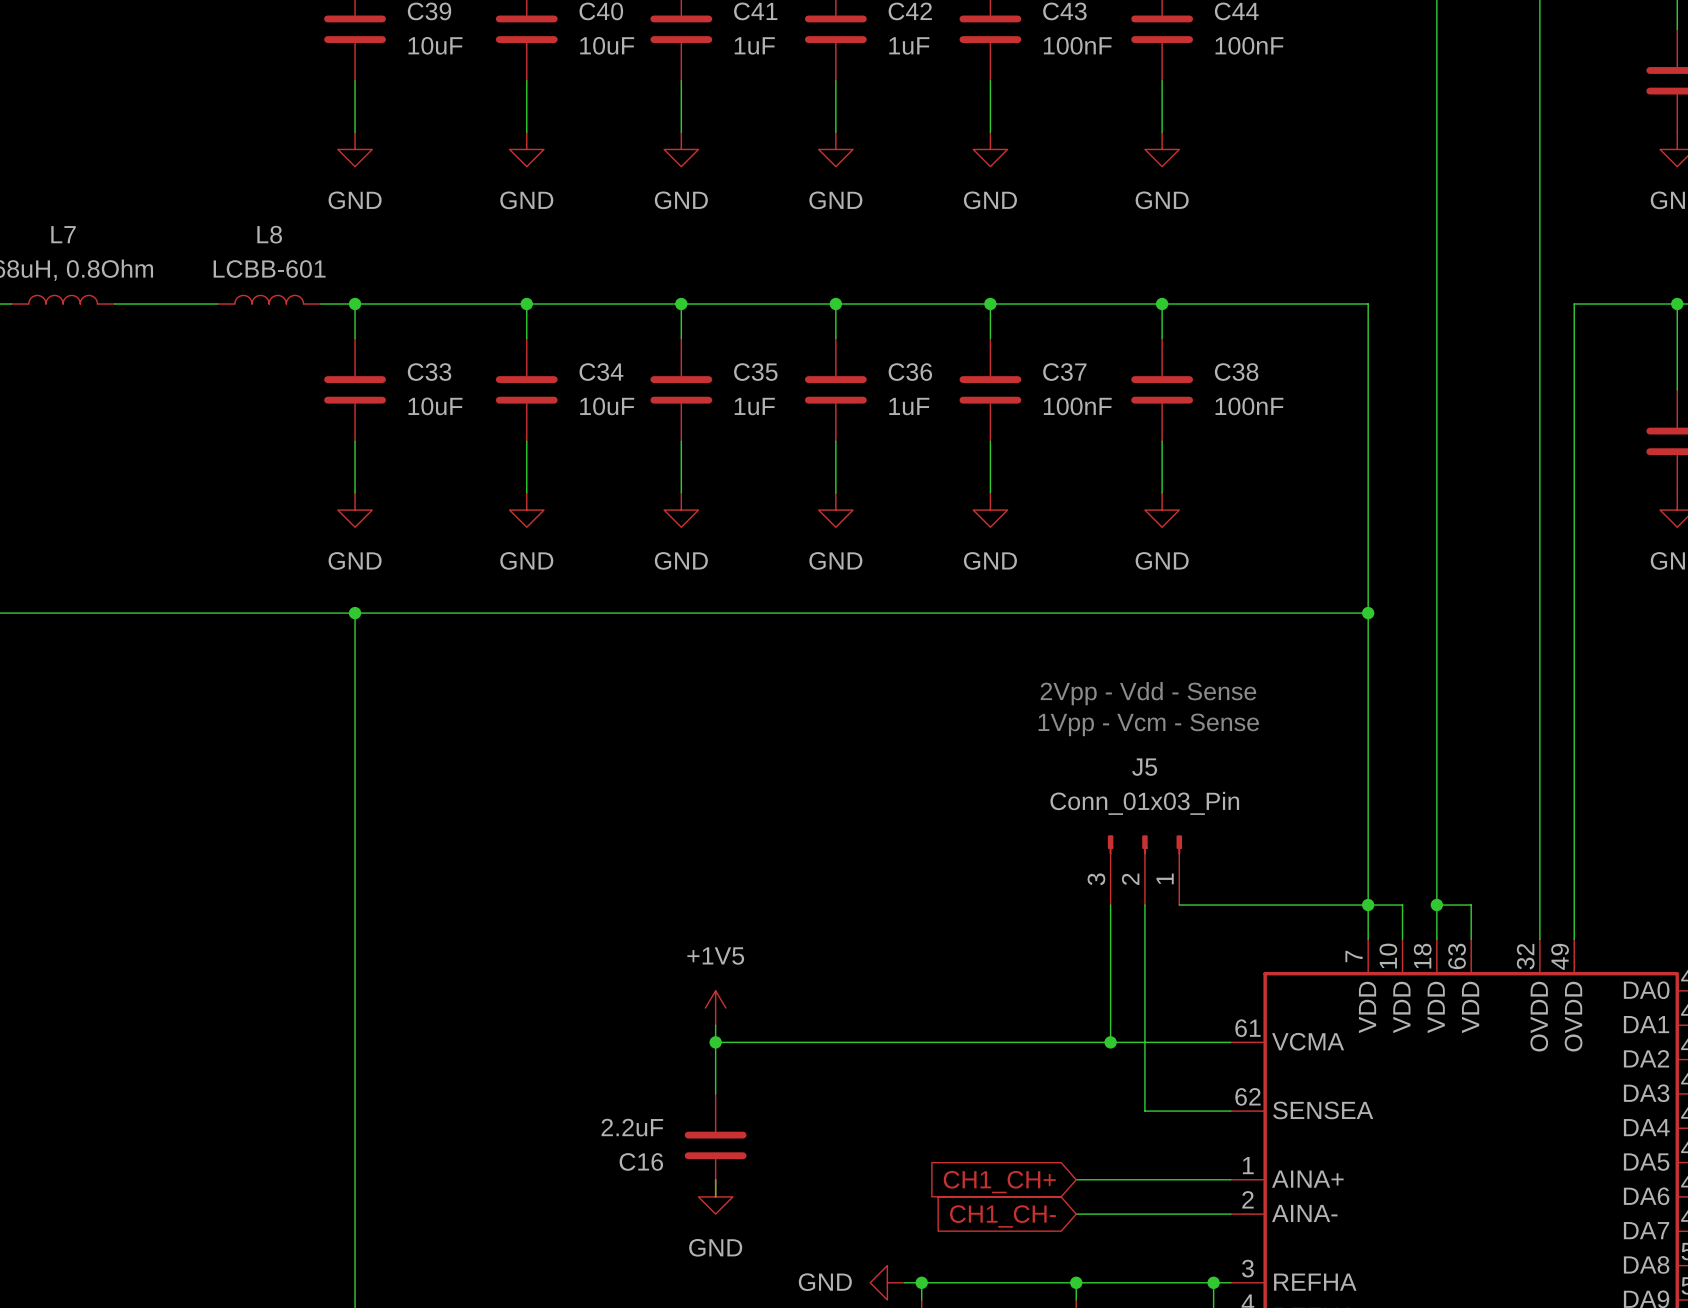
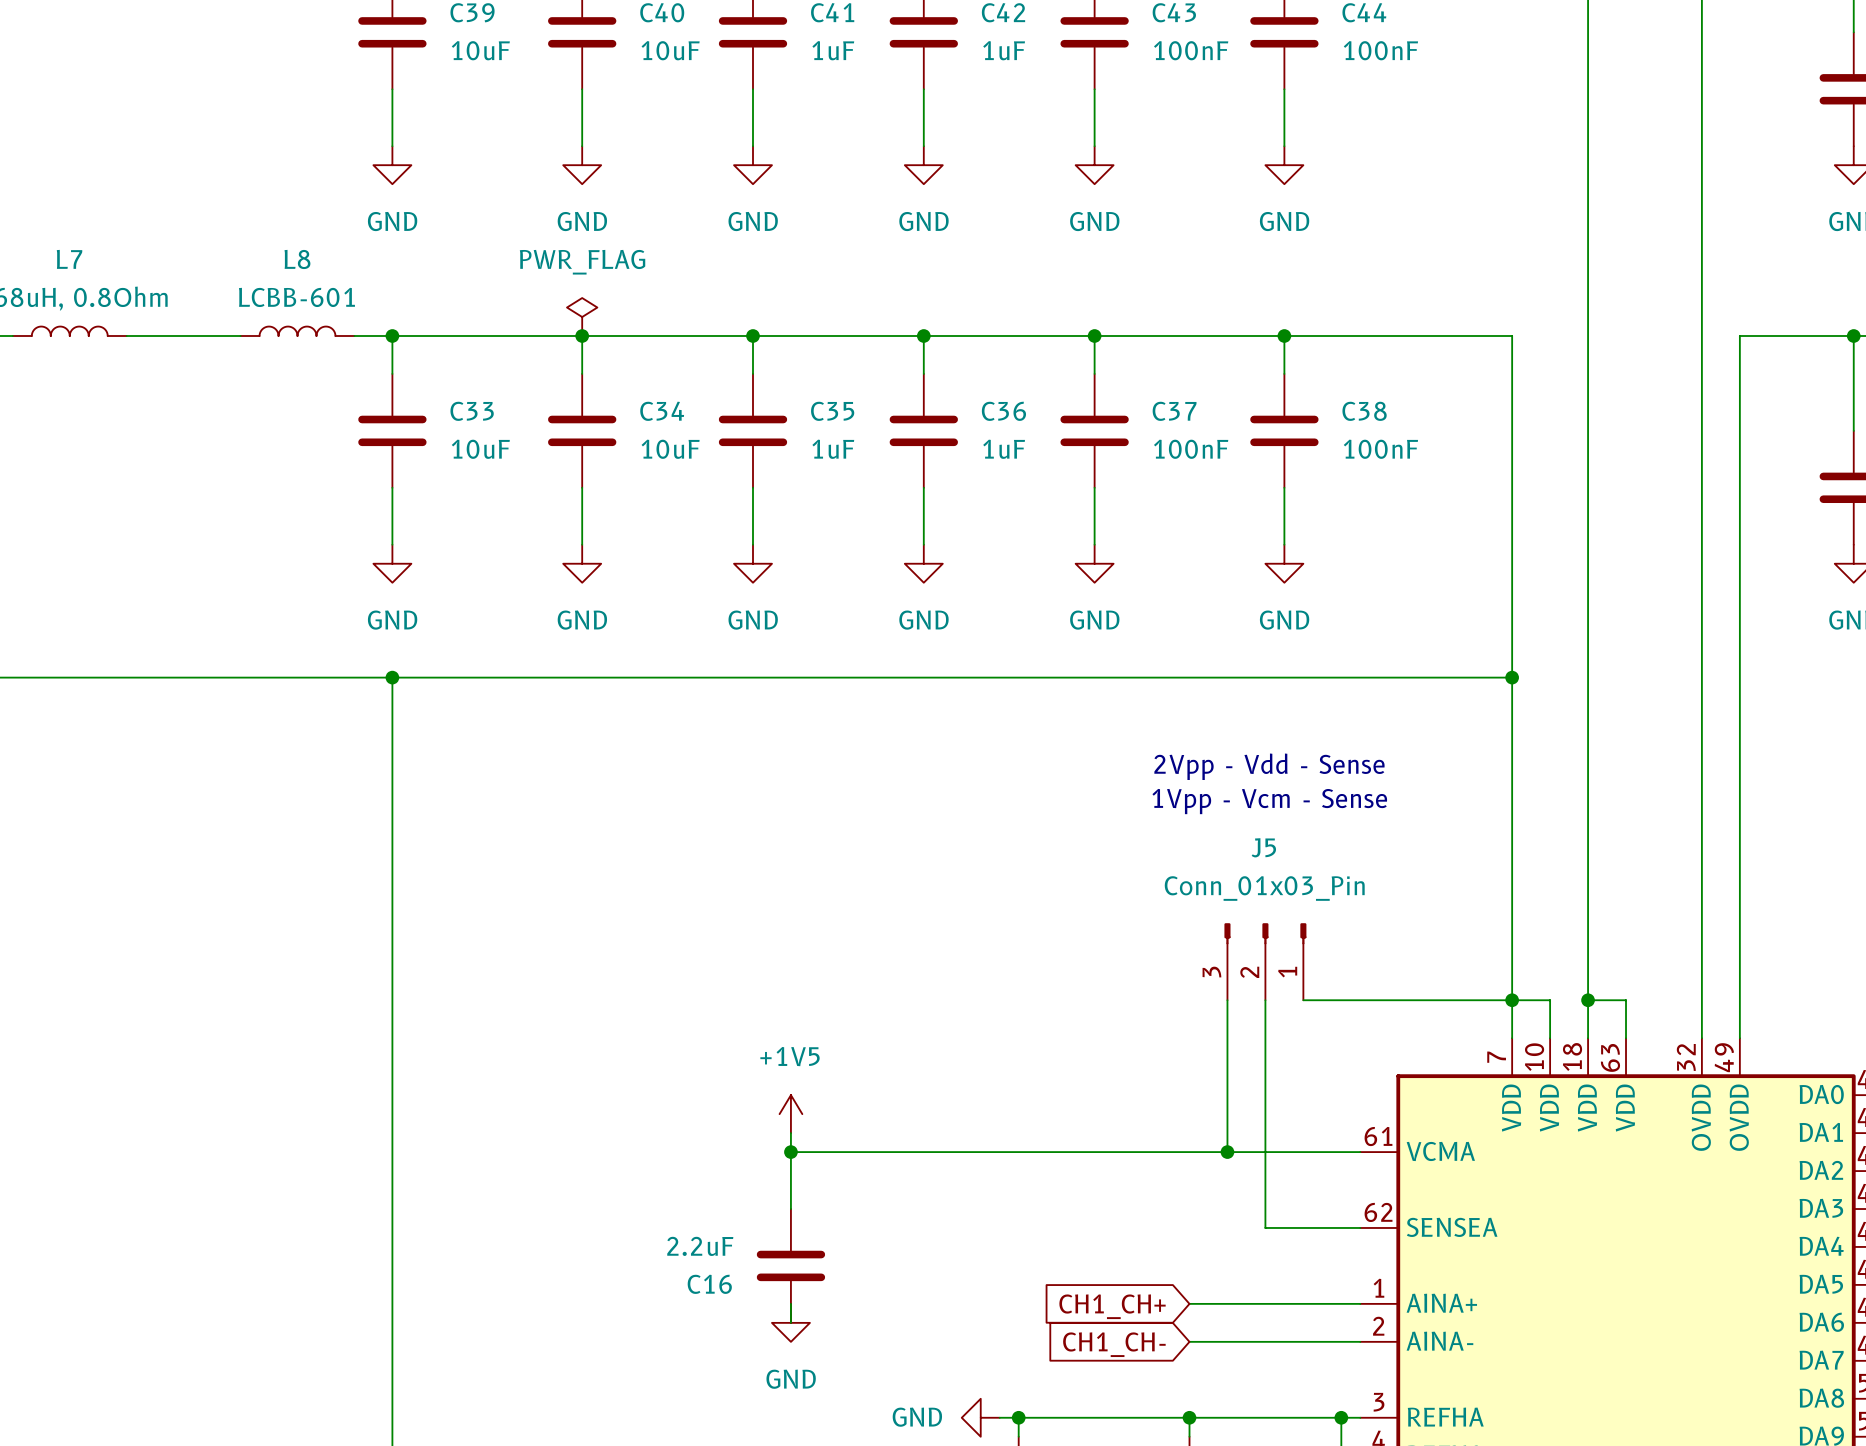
power symbol: none -> PWR_FLAG (582, 317)

